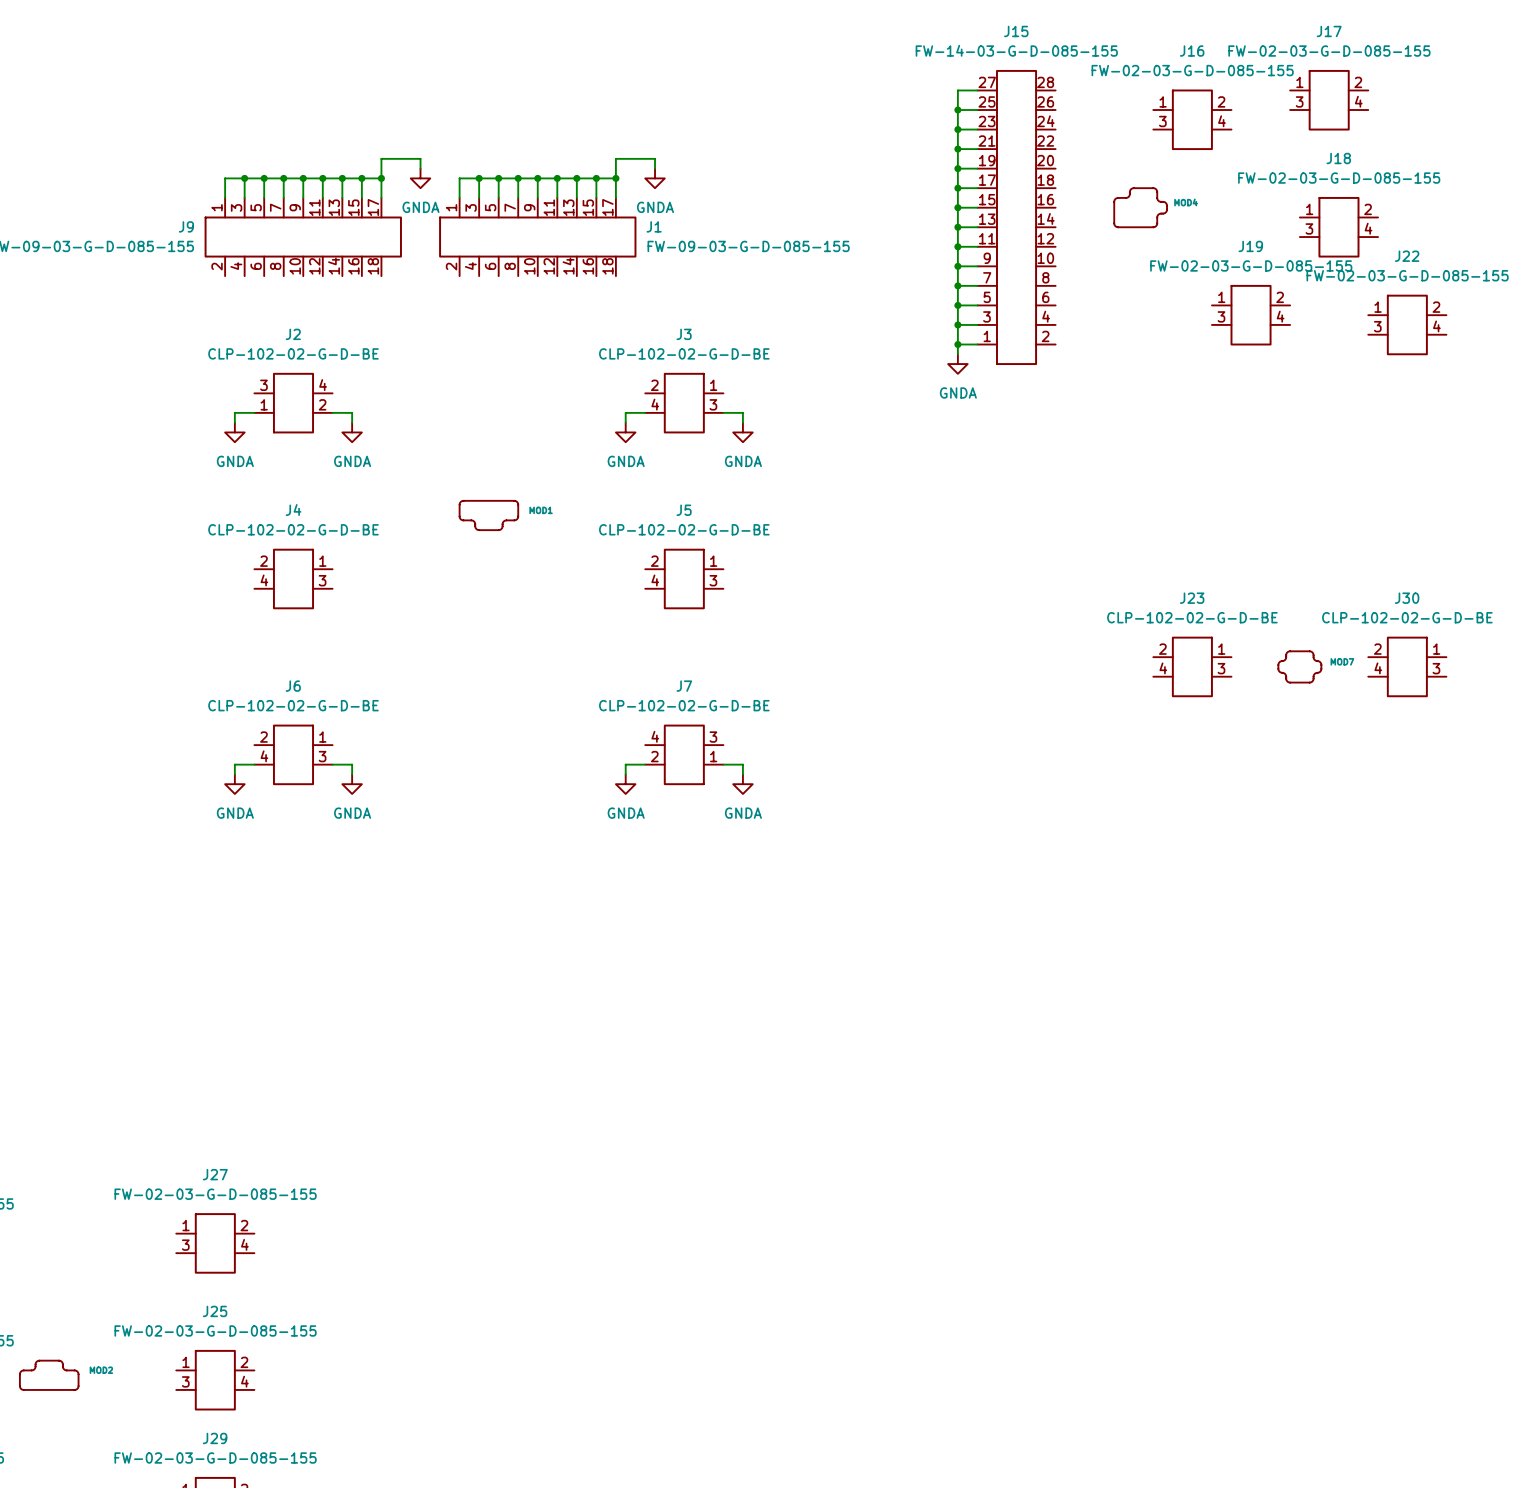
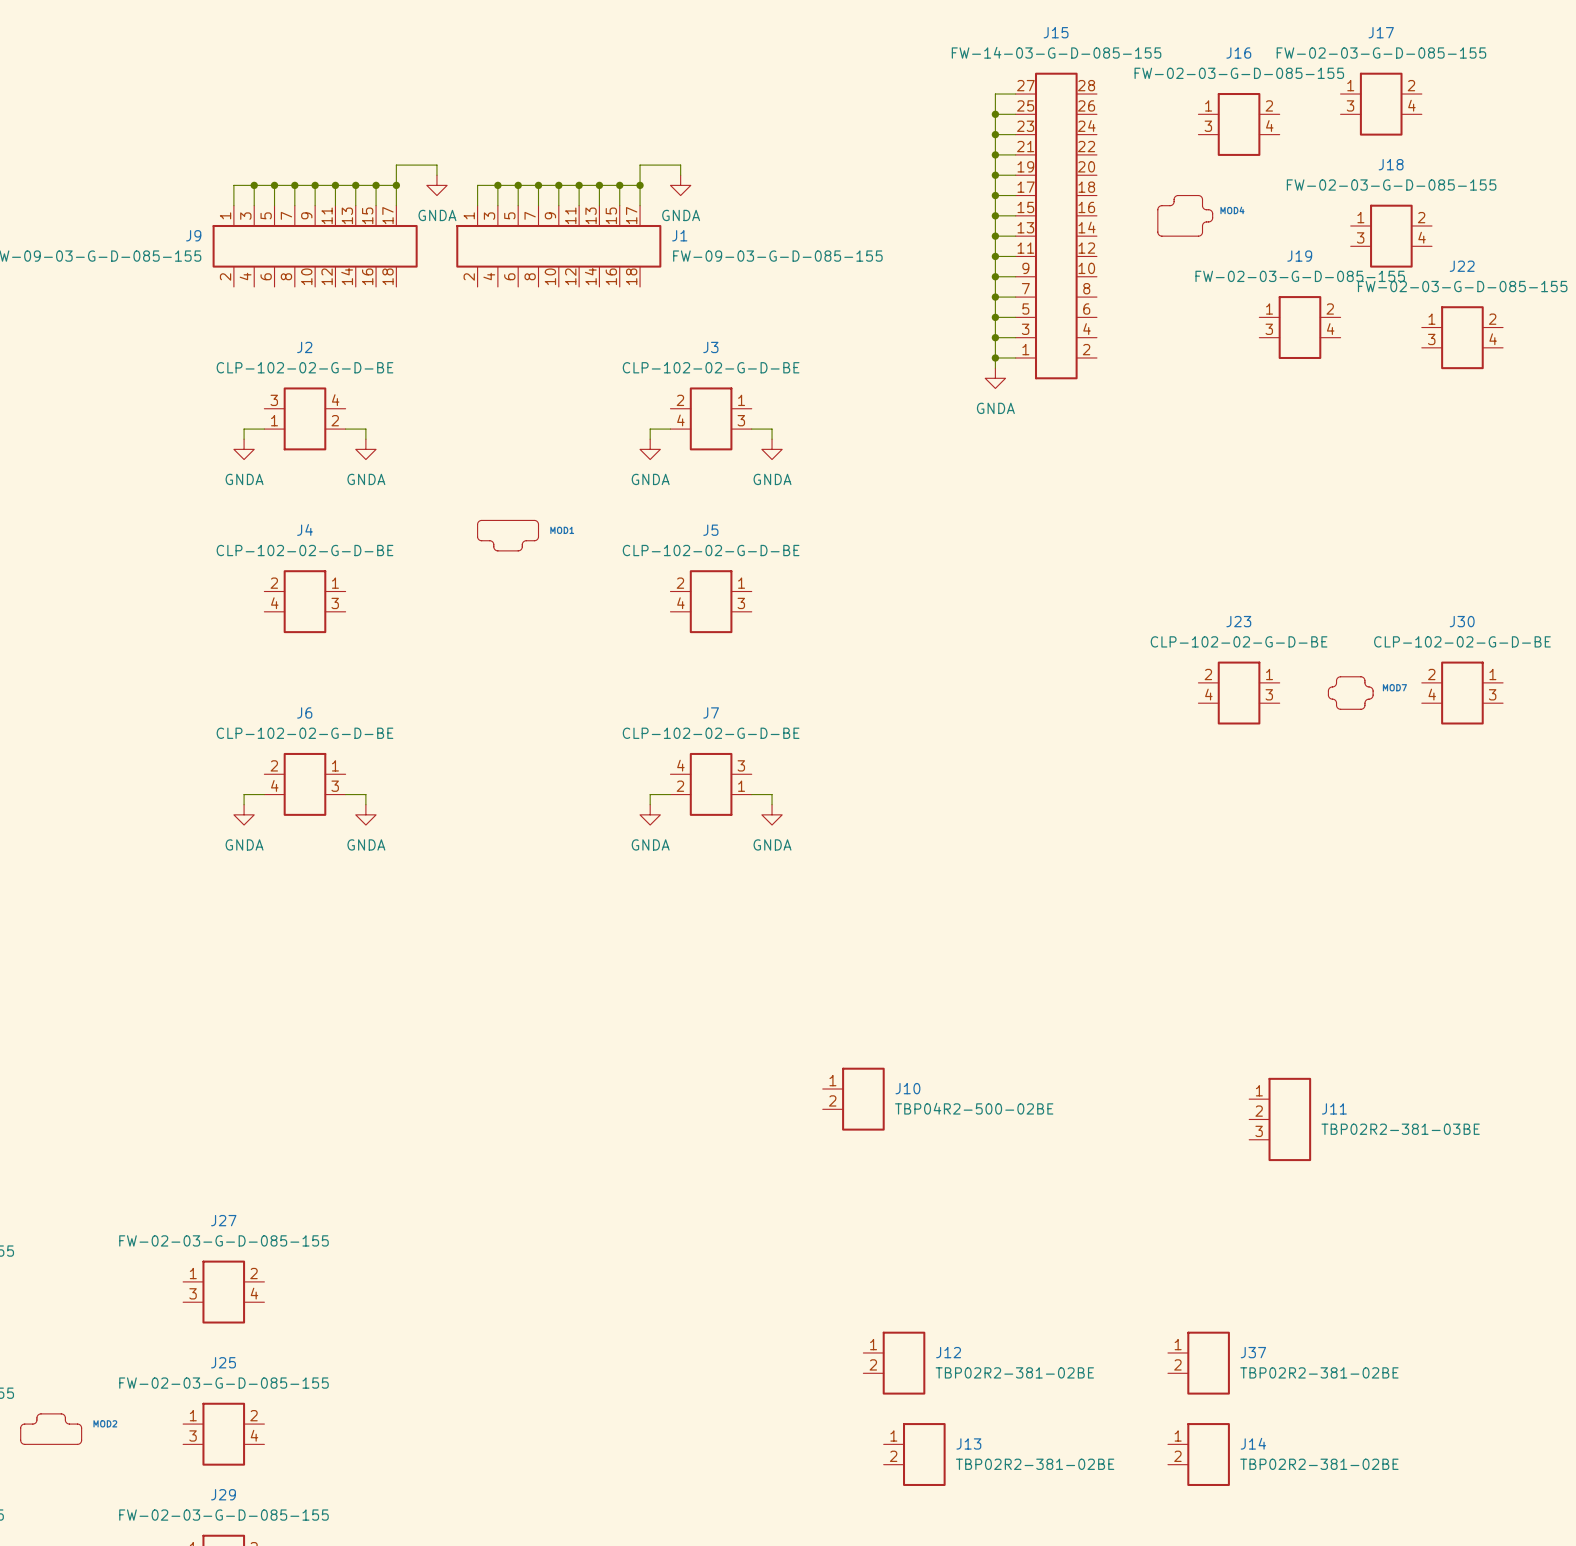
J10: none -> TBP04R2-500-02BE (853, 1099)
J11: none -> TBP02R2-381-03BE (1280, 1119)
J12: none -> TBP02R2-381-02BE (894, 1363)
J37: none -> TBP02R2-381-02BE (1198, 1363)
J13: none -> TBP02R2-381-02BE (914, 1454)
J14: none -> TBP02R2-381-02BE (1198, 1454)

